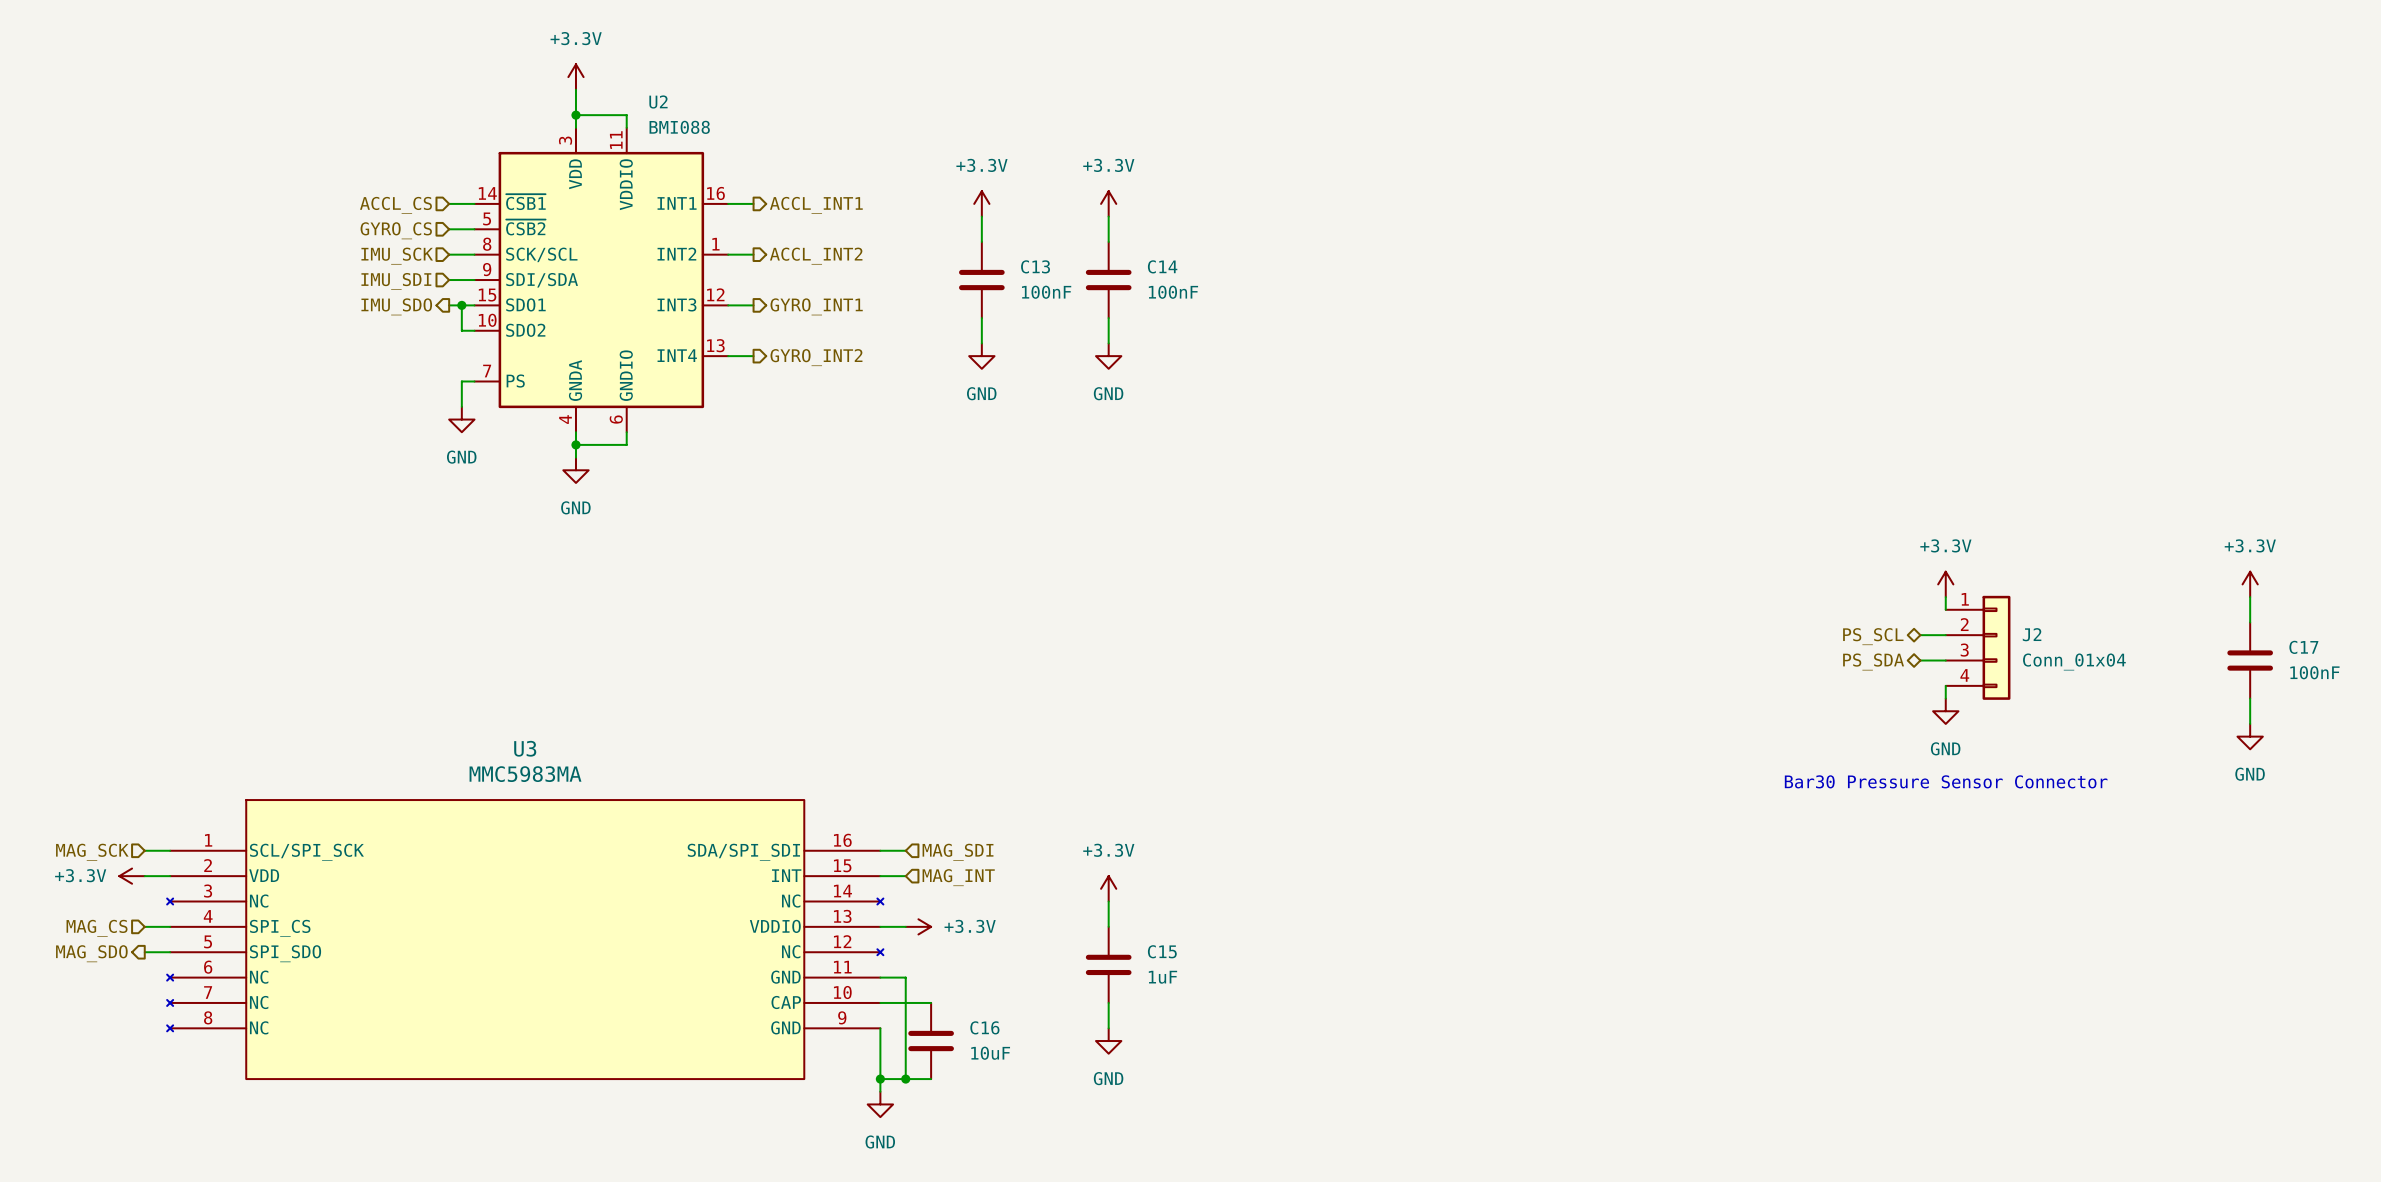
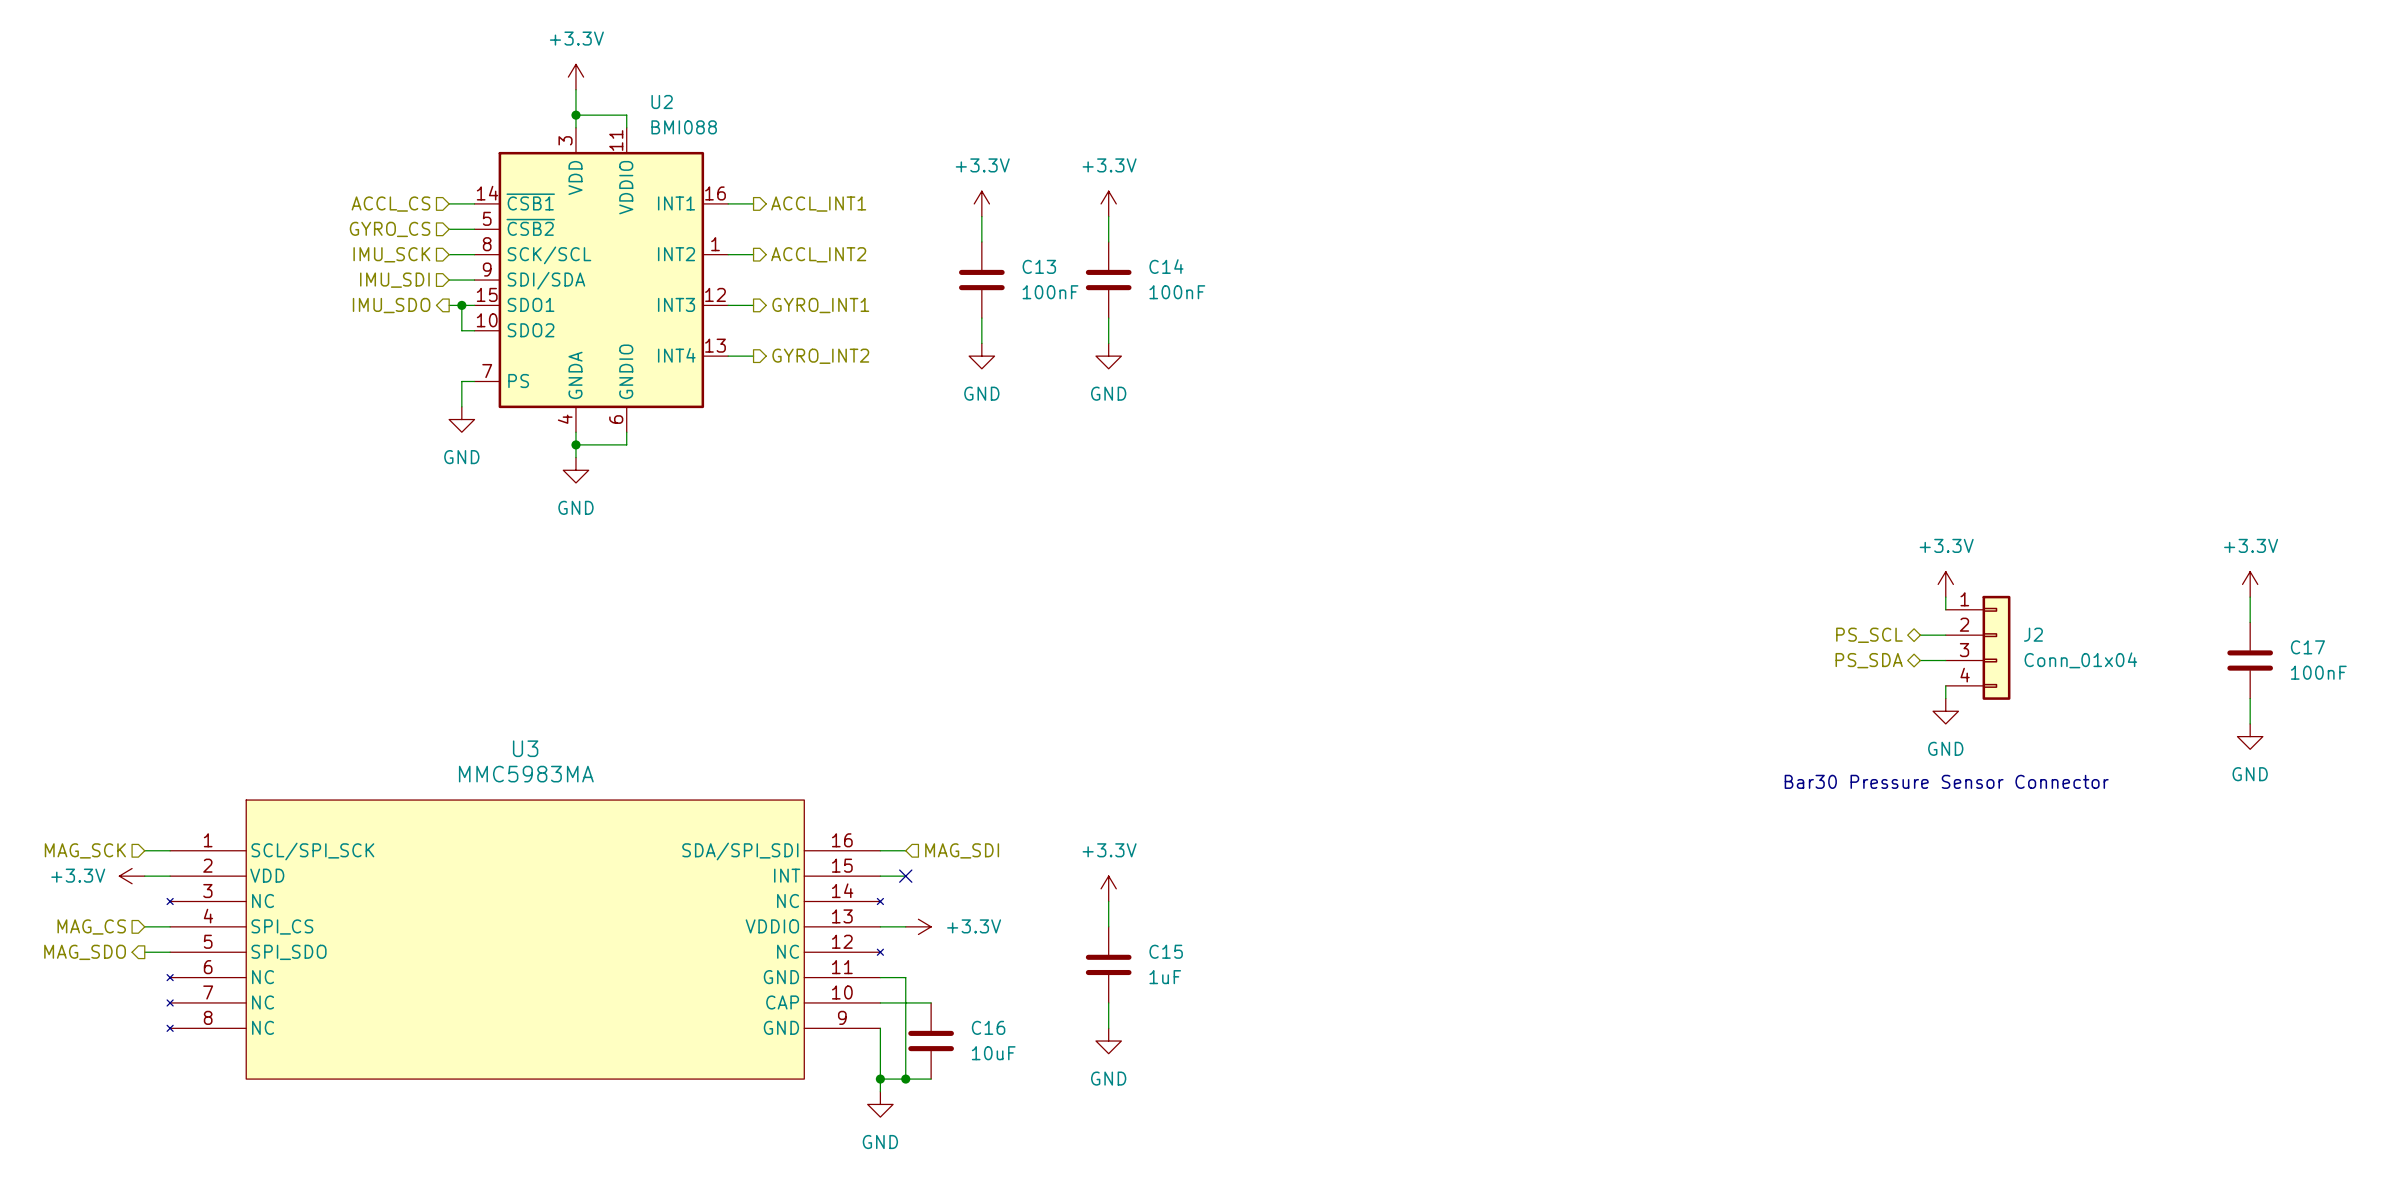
no-connect mark: none -> (905, 876)
hierarchical label: MAG_INT (958, 877) -> none

